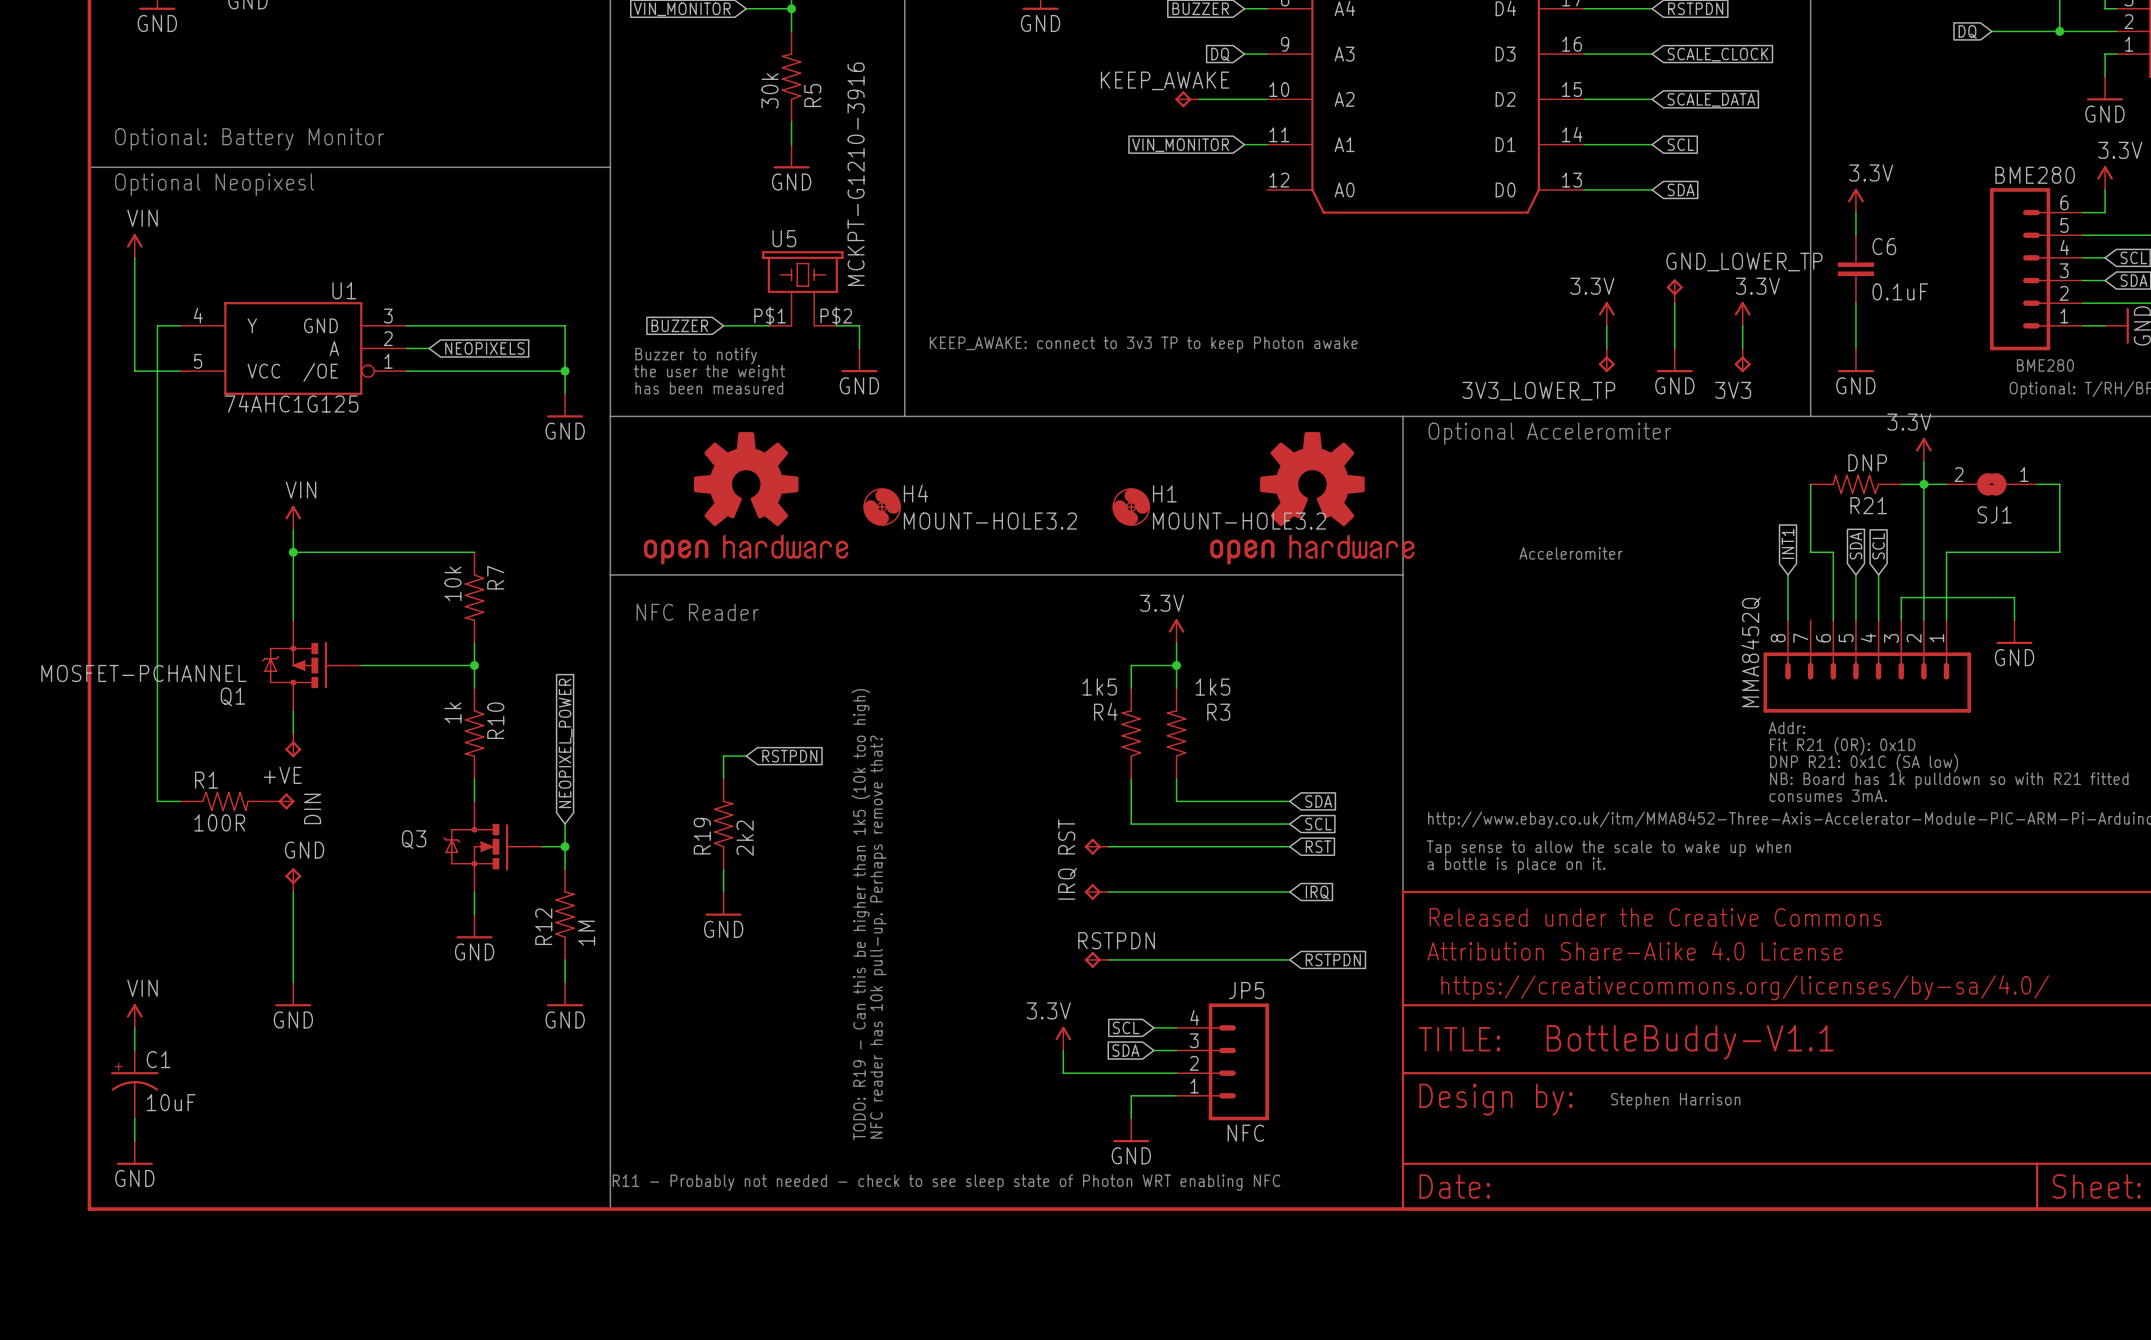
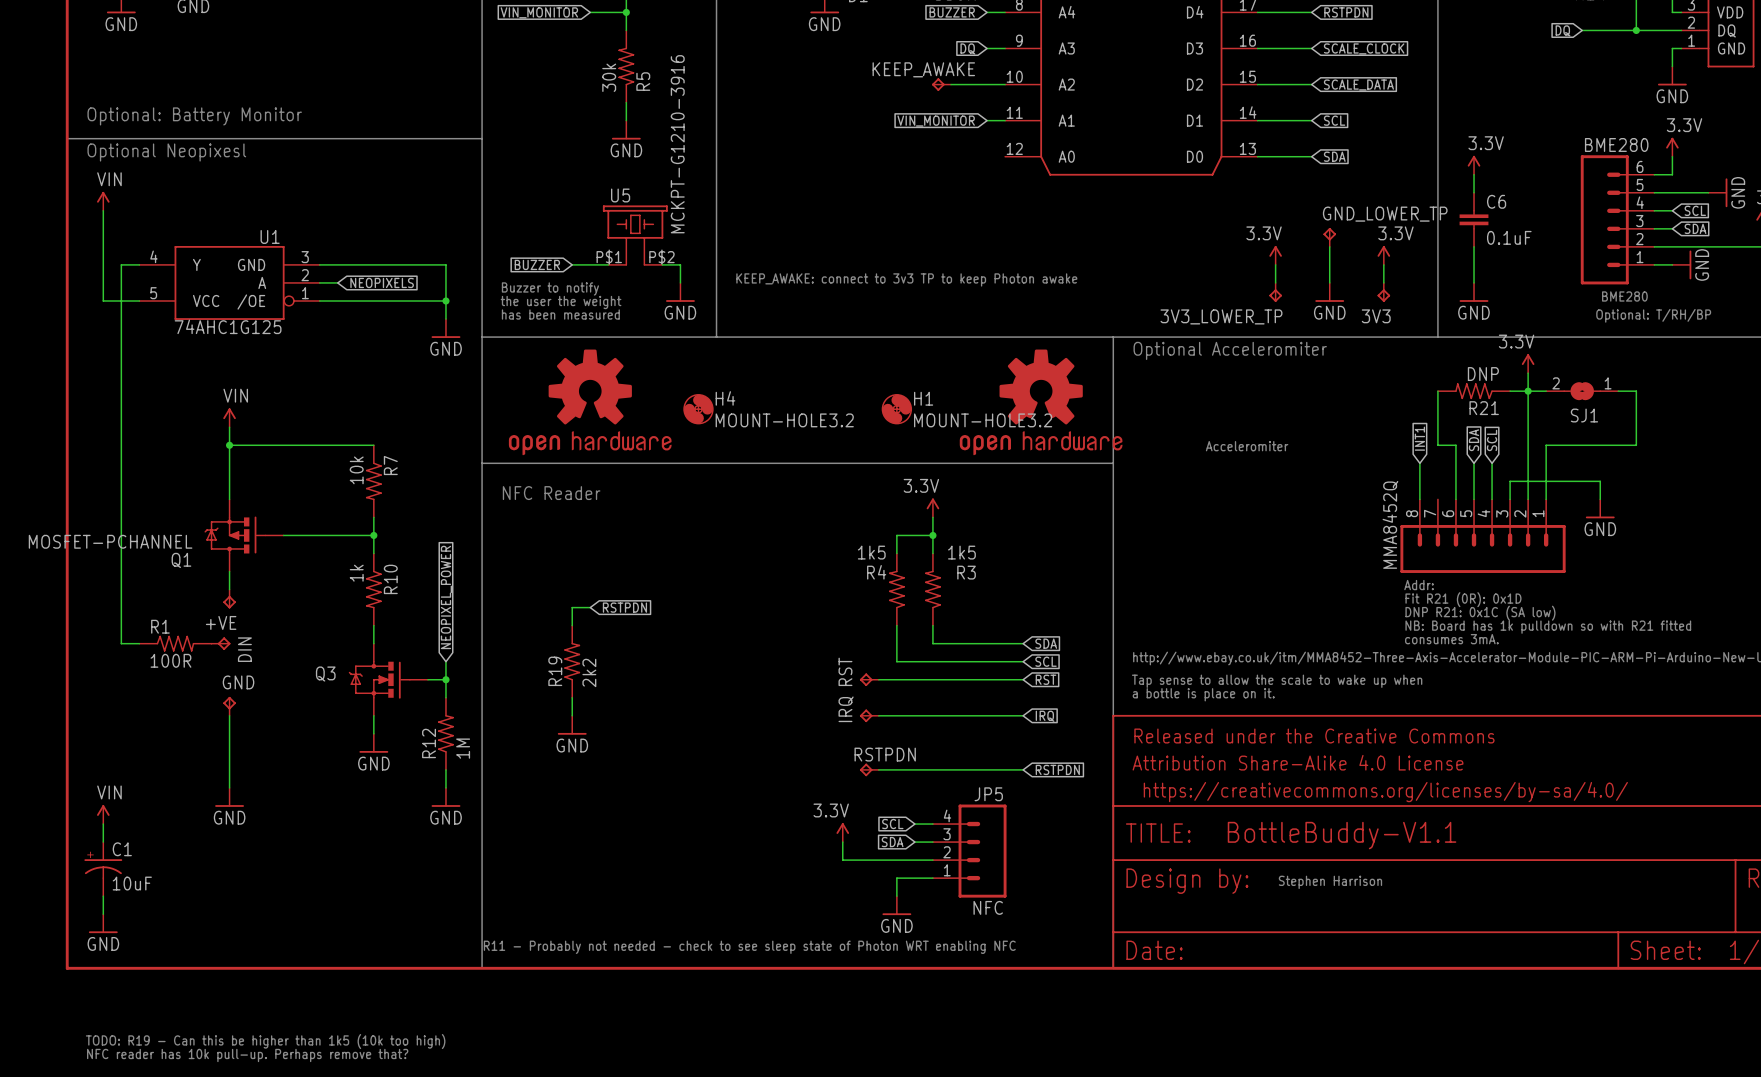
text: TODO: R19 - Can this be higher than 1k5 (10k too high) (860, 914) -> none
text: NFC reader has 10k pull-up. Perhaps remove that? (878, 937) -> none
text: none -> TODO: R19 - Can this be higher than 1k5 (10k too high) (265, 1041)
text: none -> NFC reader has 10k pull-up. Perhaps remove that? (247, 1055)

